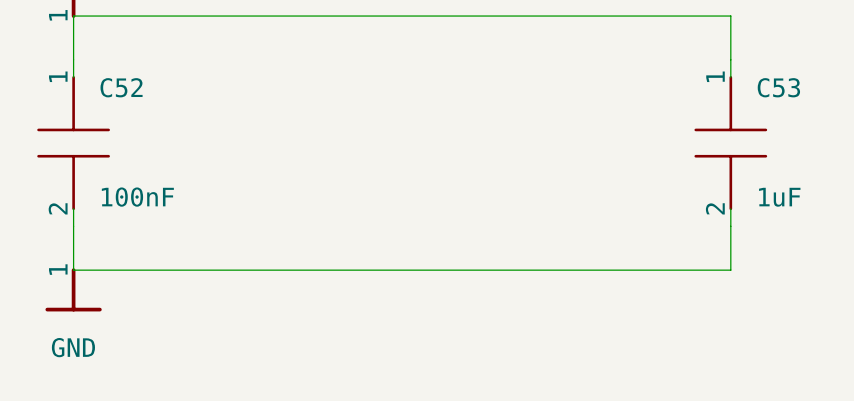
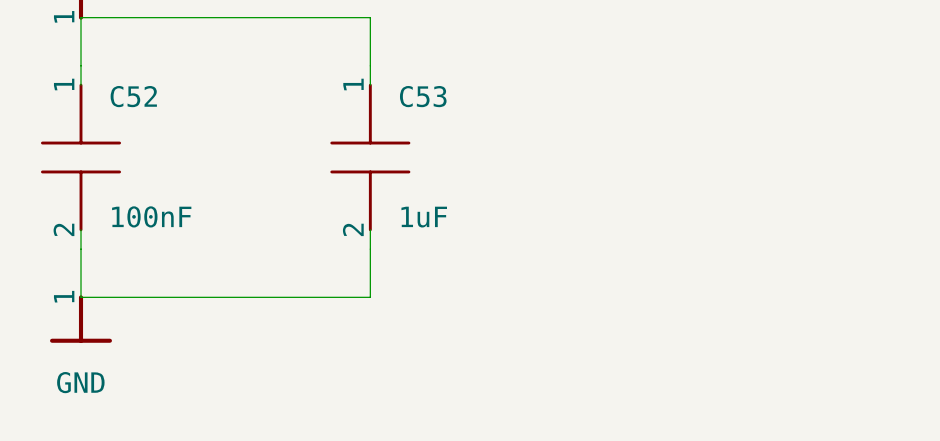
wire: (336, 16) (730, 16) (730, 77) -> (370, 17) (370, 85)
C53 position: (730, 143) -> (370, 157)
wire: (730, 208) (730, 270) (336, 270) -> (370, 229) (370, 297)

